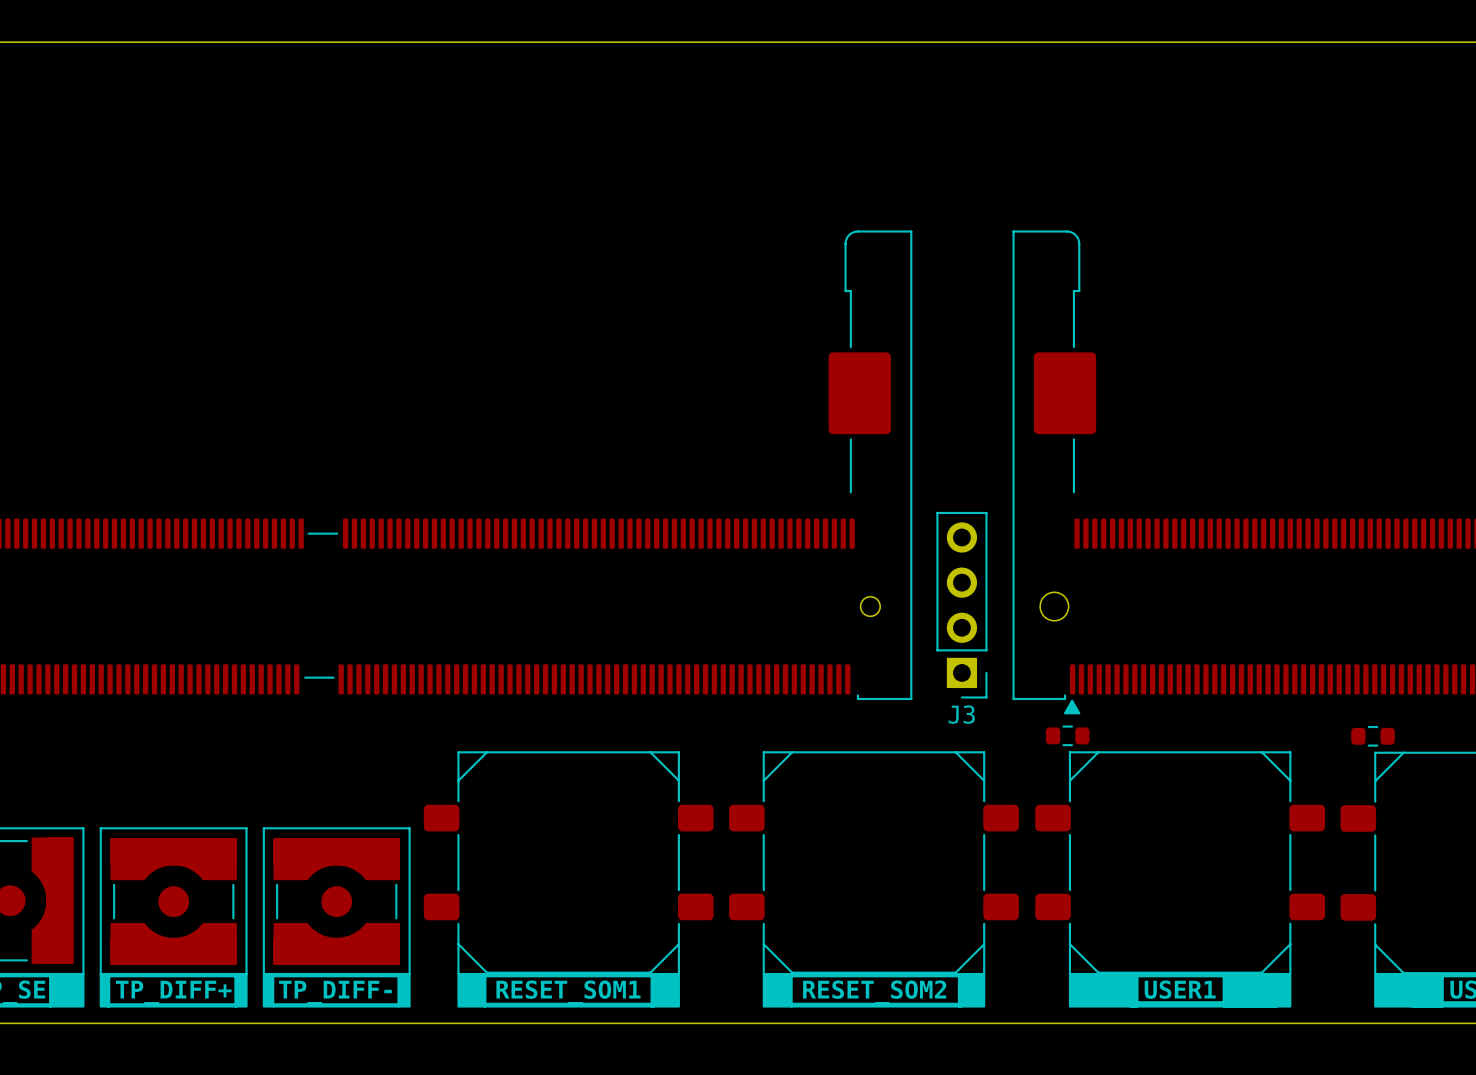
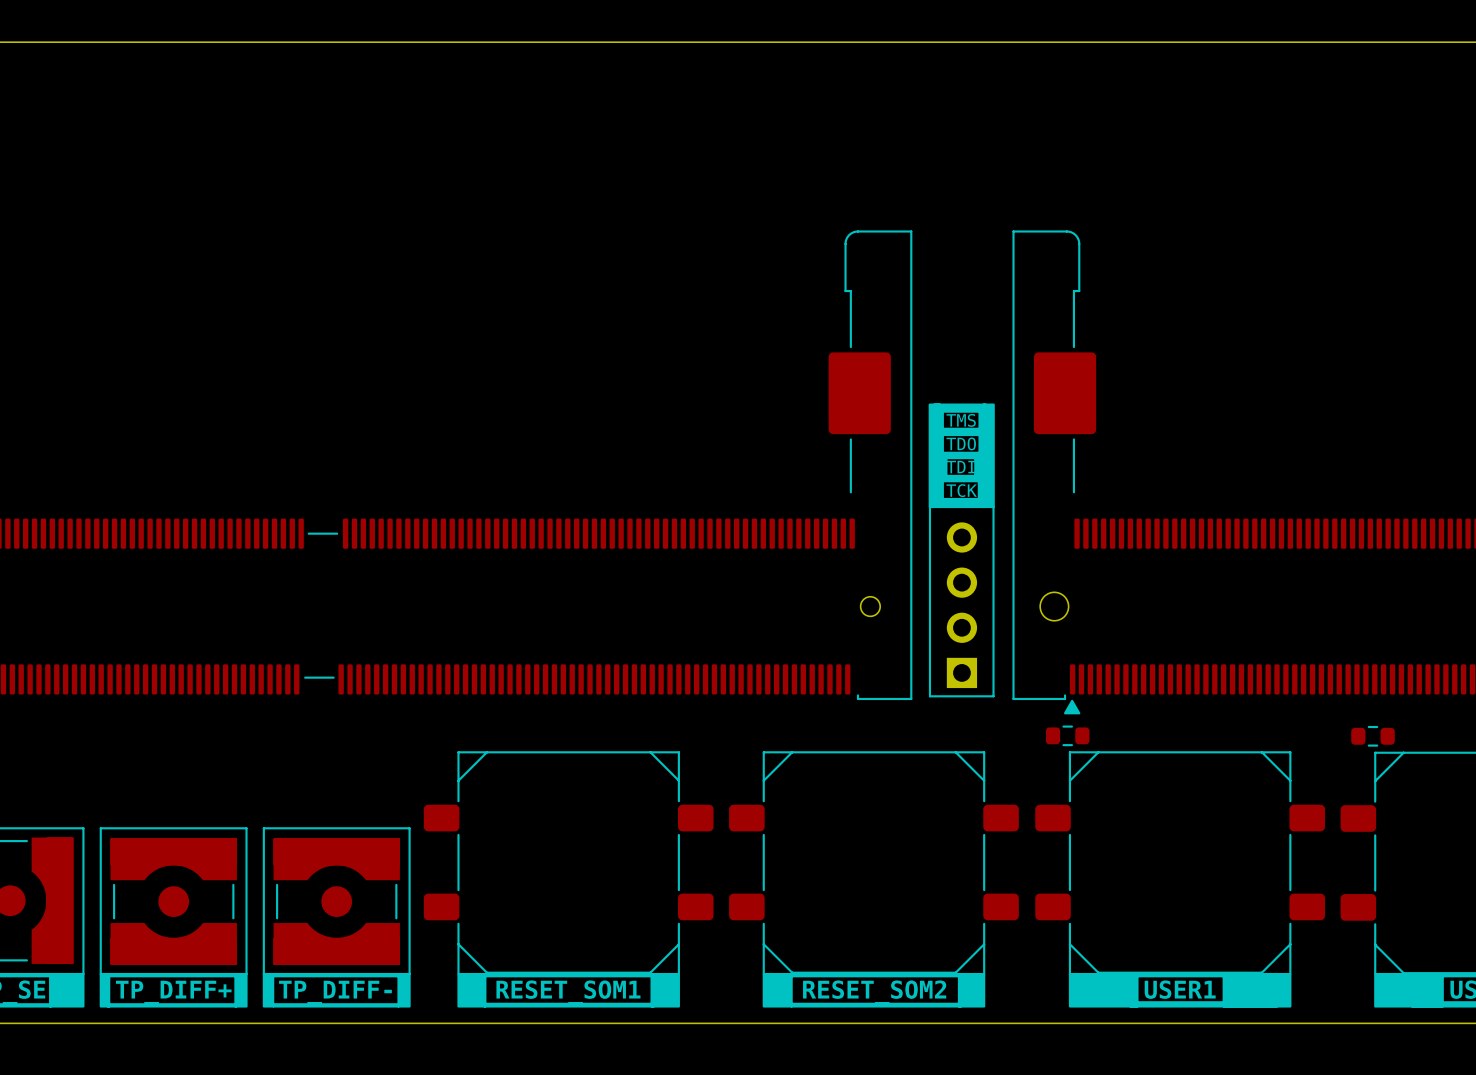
drawing: none -> [928, 403, 995, 508]
text: none -> TMS (961, 420)
text: none -> TDO (961, 443)
text: none -> TDI (960, 467)
text: none -> TCK (961, 490)
line: none -> (929, 507) (993, 507) (993, 696) (929, 696) (929, 507)
J3: (961, 605) -> none

